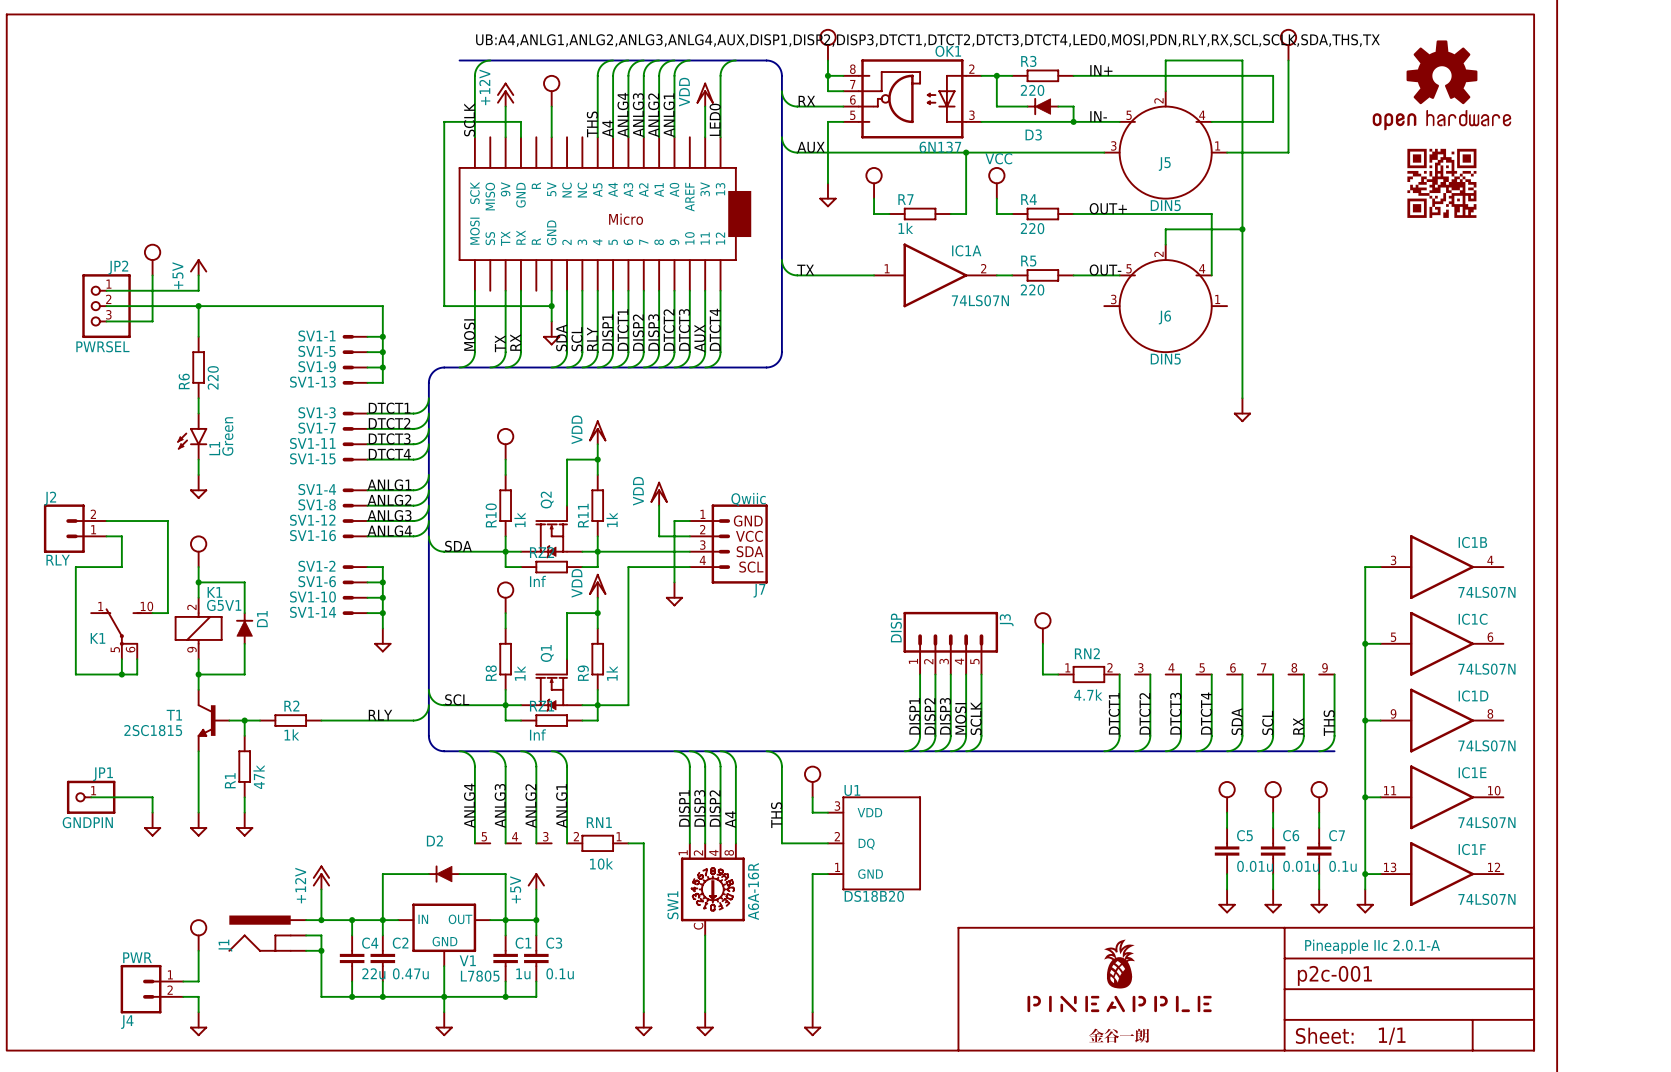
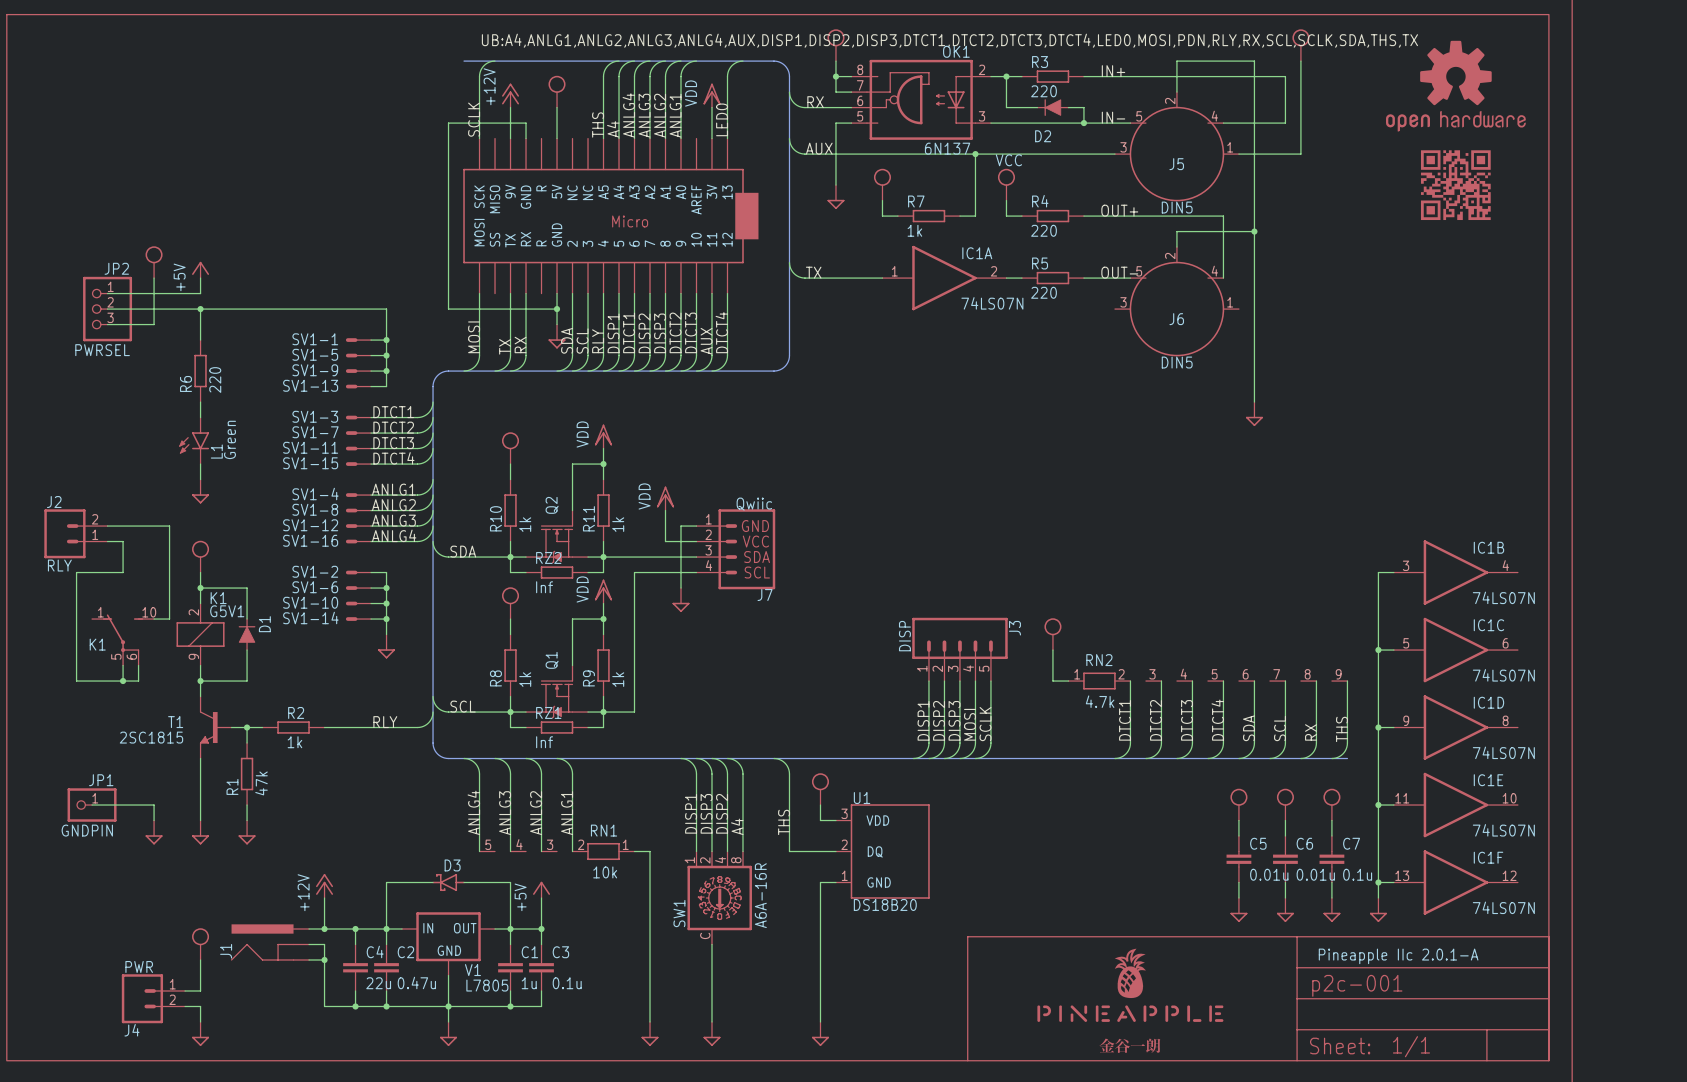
D3 name: D3 (1033, 134) -> D2 (1043, 136)
D2: (444, 874) -> none
D3: none -> (448, 882)

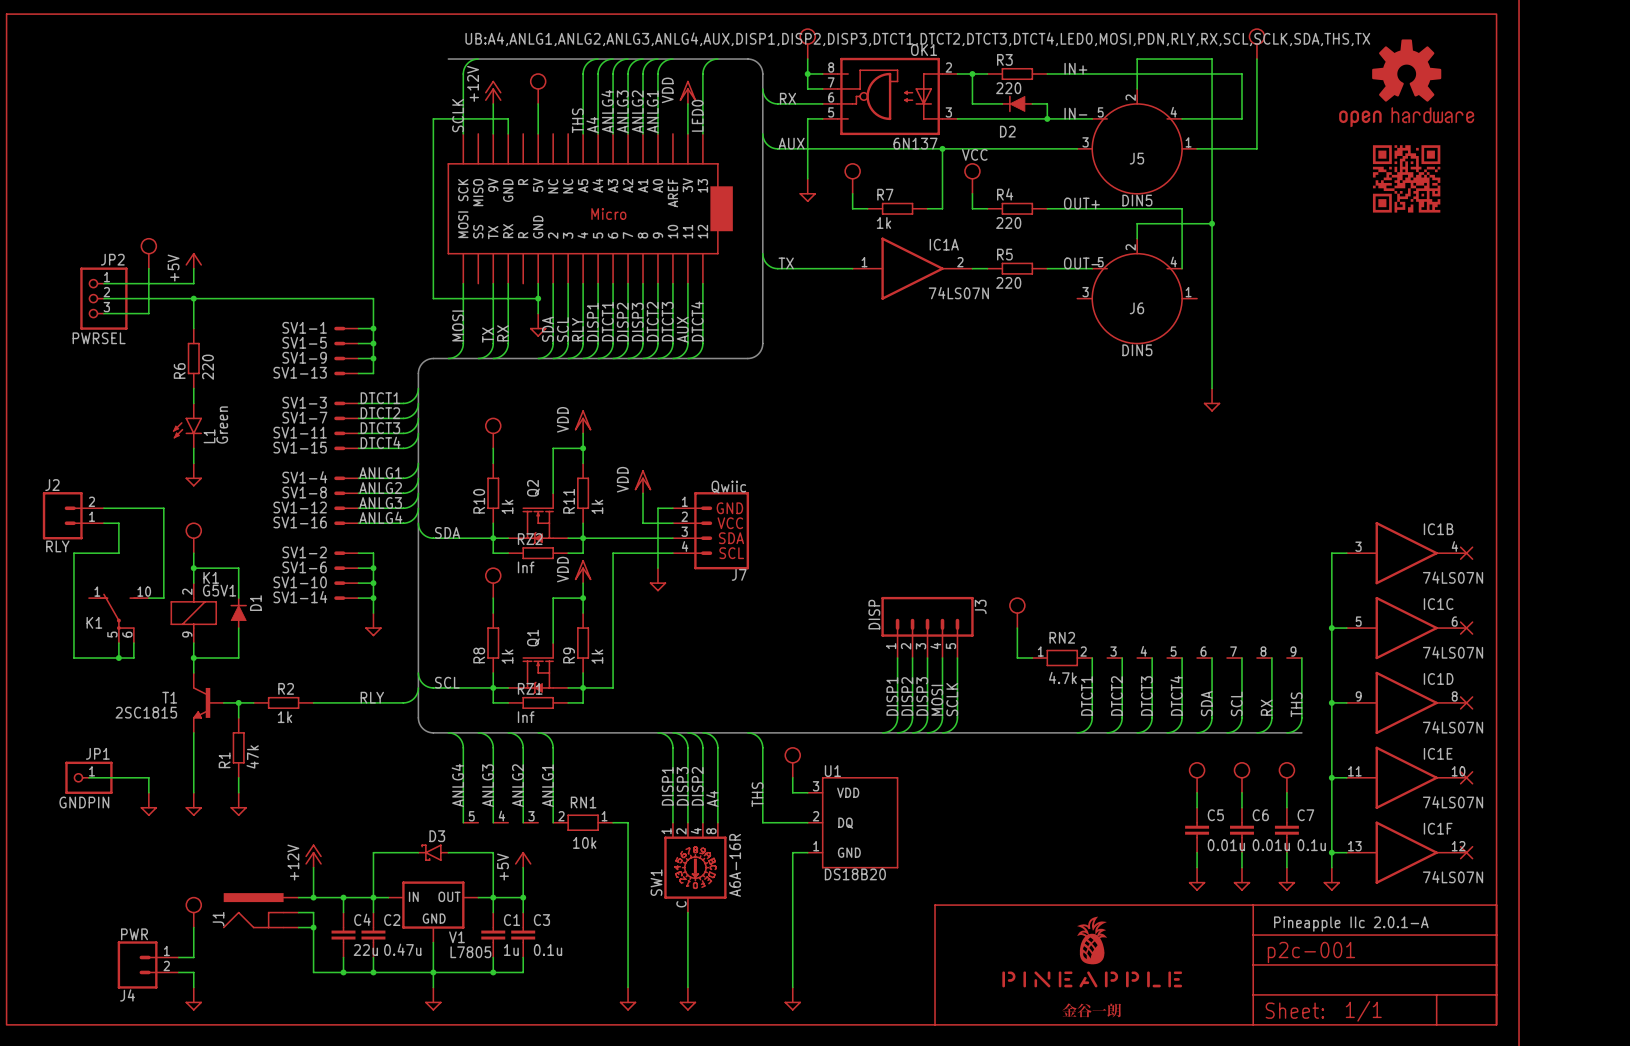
part: none -> (1466, 553)
part: none -> (1466, 628)
part: none -> (1466, 702)
part: none -> (1466, 777)
part: none -> (1466, 852)

